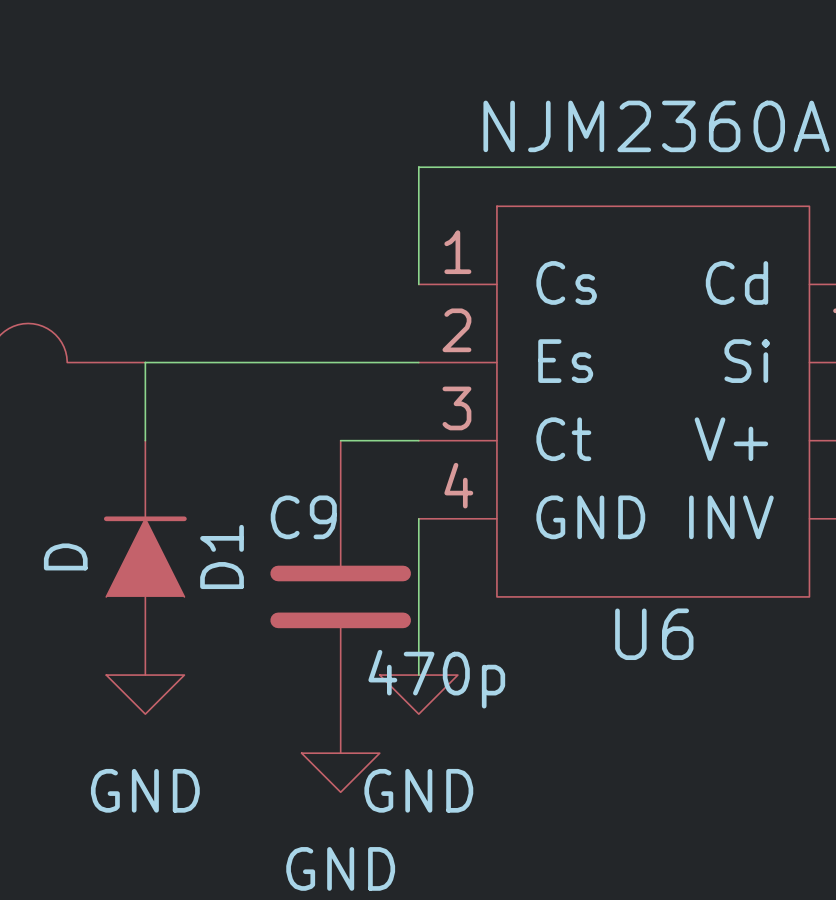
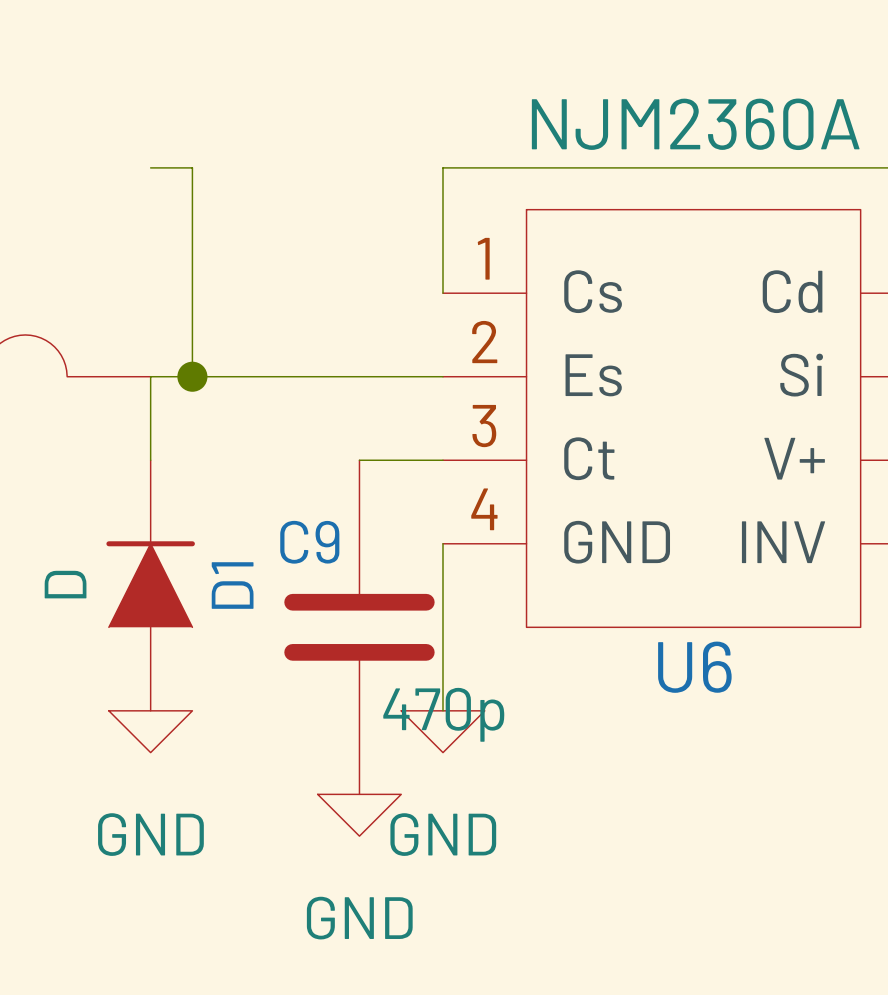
wire: none -> (150, 167) (192, 167) (192, 376)
junction: none -> (192, 376)

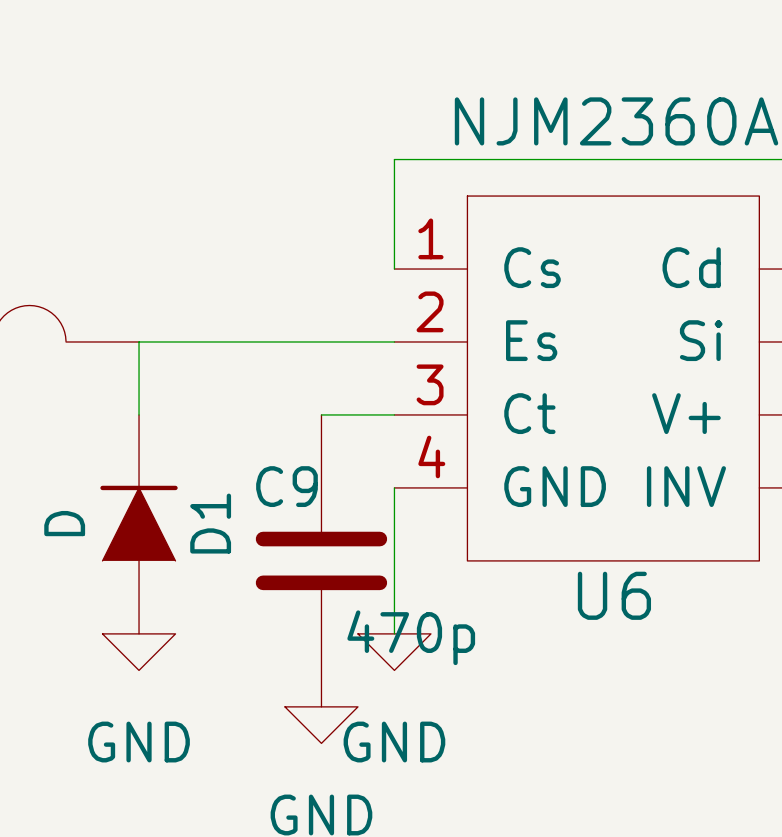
wire: (150, 167) (192, 167) (192, 376) -> none
junction: (192, 376) -> none

